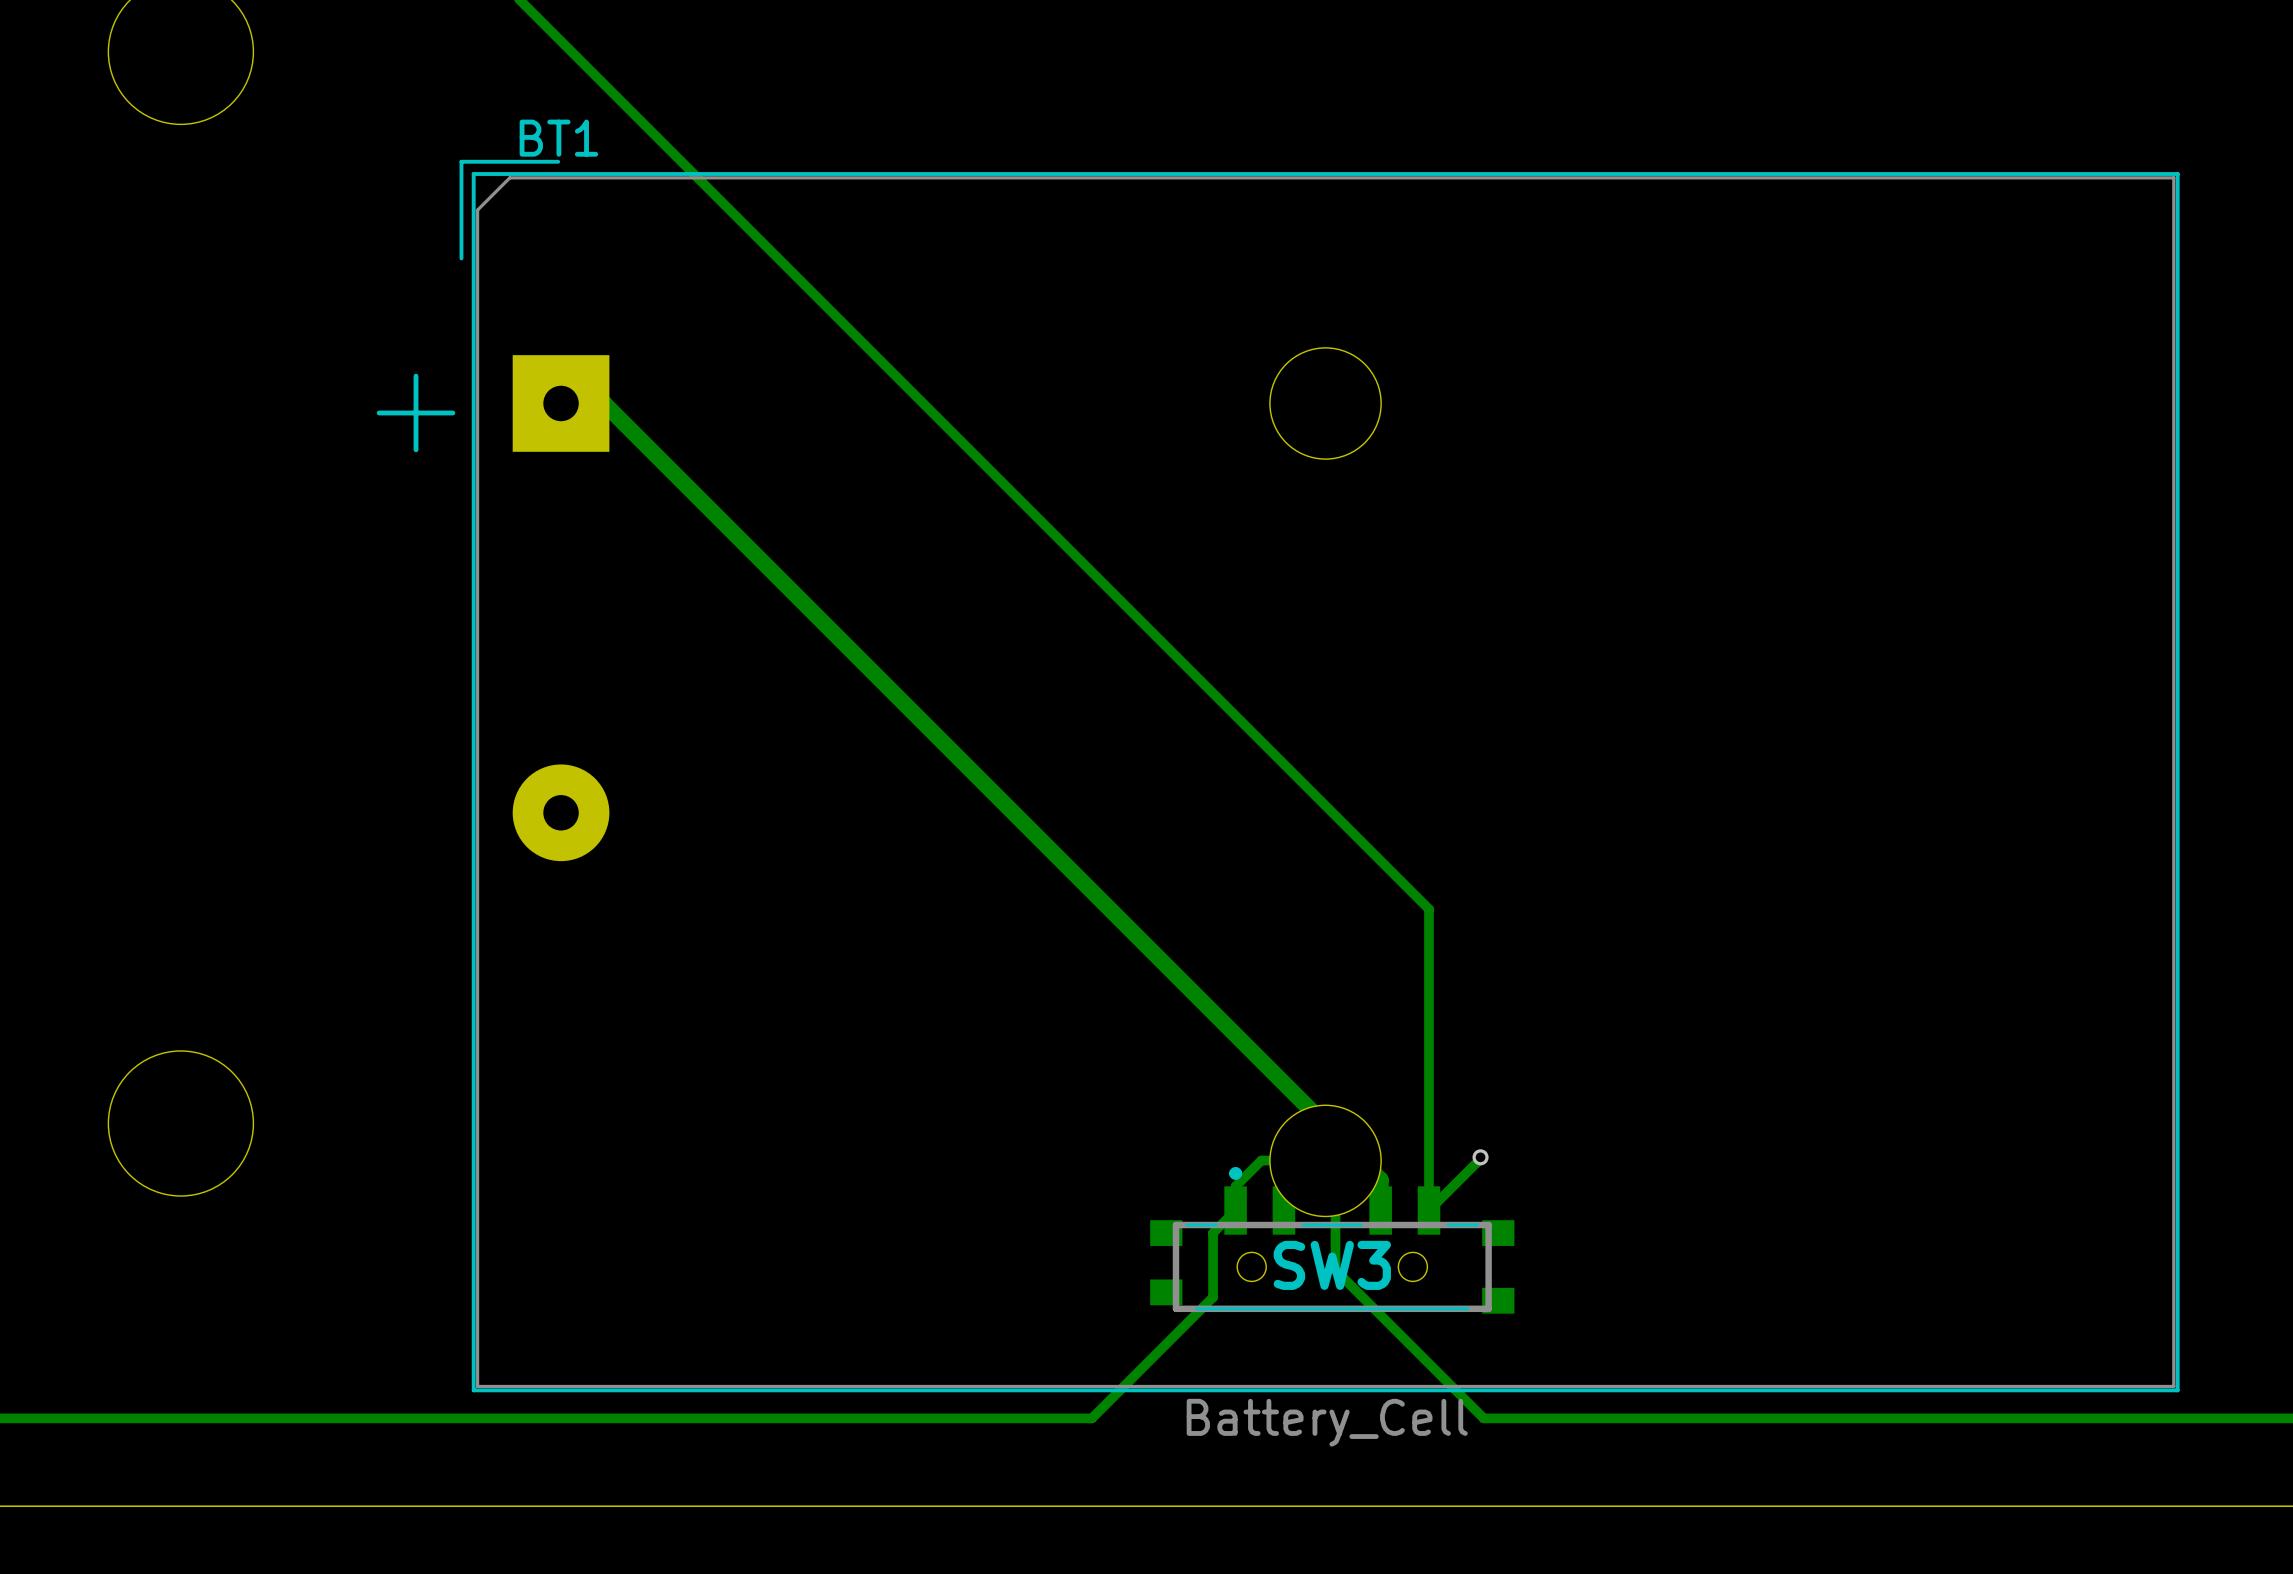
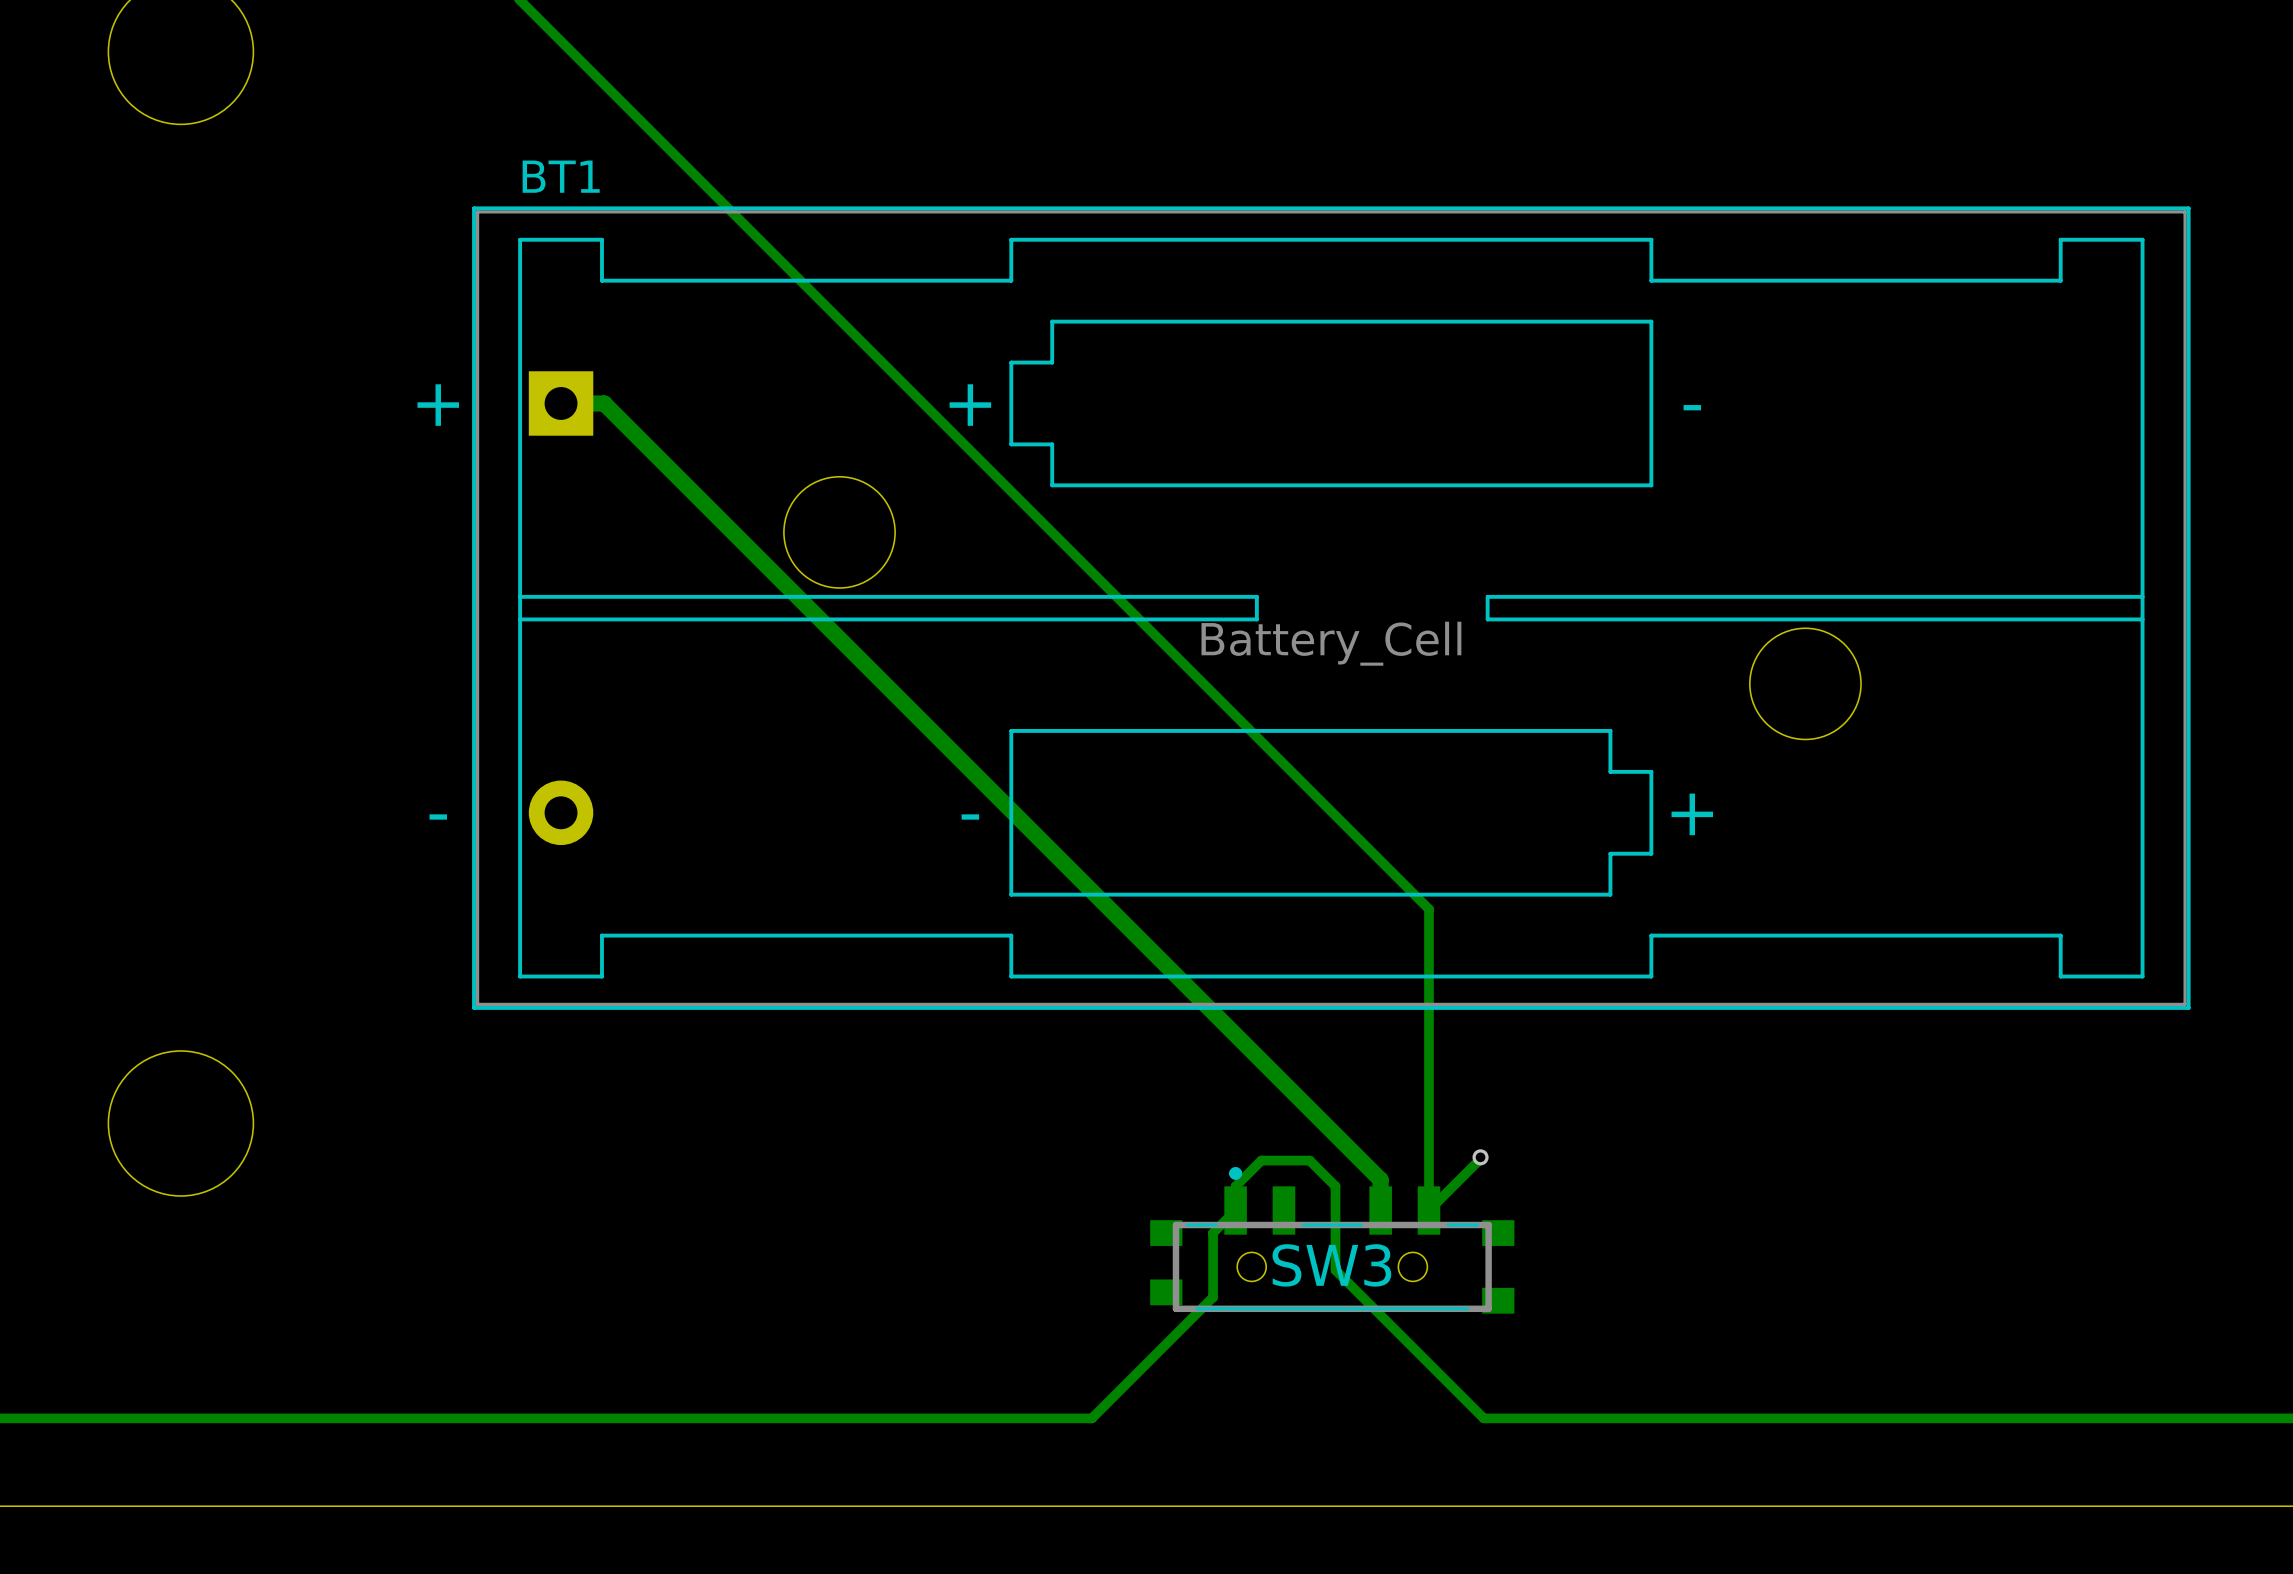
BT1 name position: BT1 (558, 138) -> BT1 (561, 176)
BT1 footprint: [459, 159, 2180, 1393] -> [472, 206, 2191, 1010]
BT1 value position: Battery_Cell (1327, 1422) -> Battery_Cell (1331, 643)

